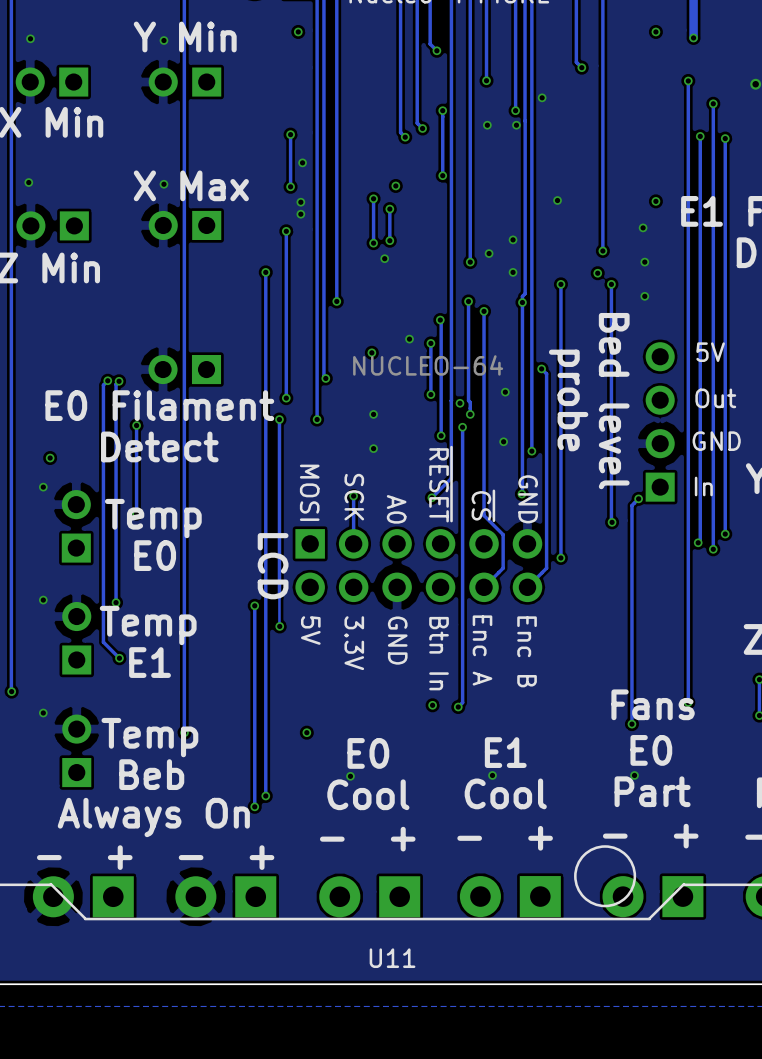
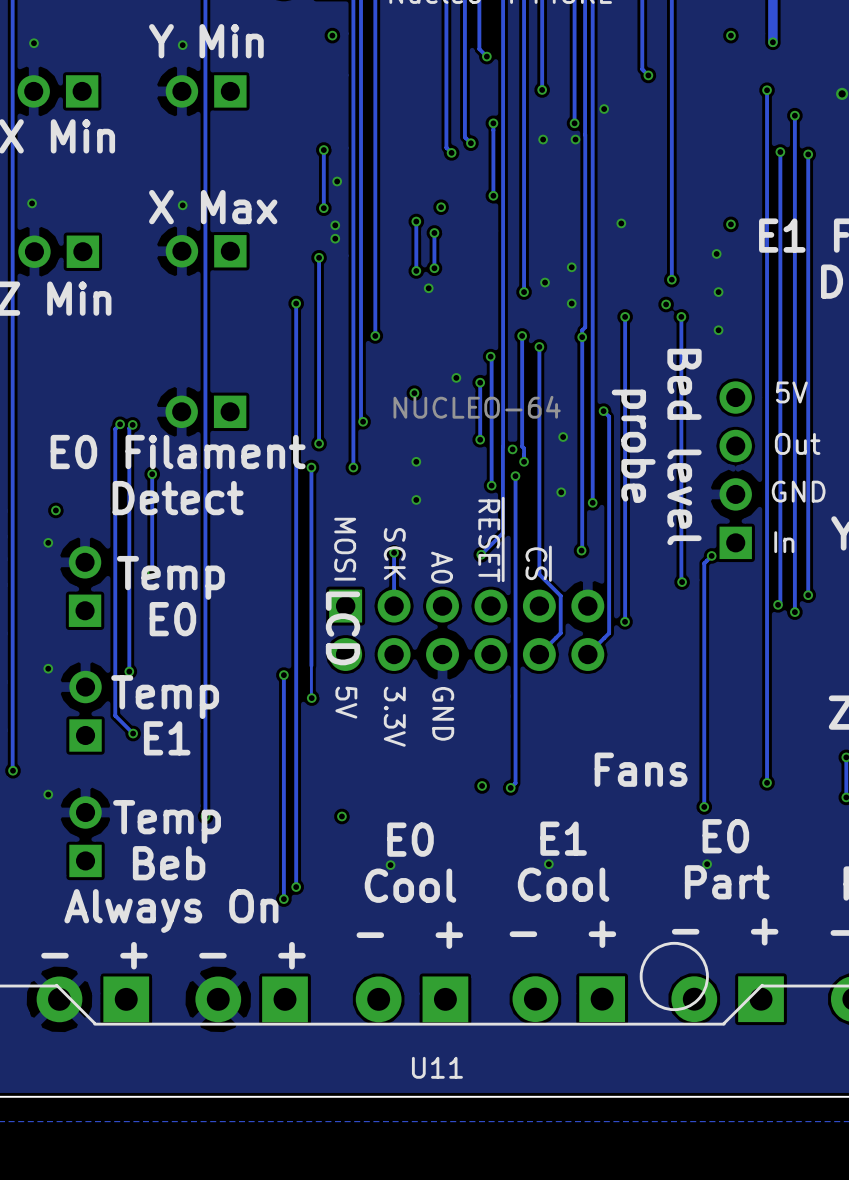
text: GND (528, 499) -> none
text position: LCD (273, 566) -> LCD (343, 628)
text: Enc A (482, 650) -> none
text: Enc B (527, 651) -> none
text: Btn In (439, 653) -> none
text position: Fans (653, 704) -> Fans (641, 769)

